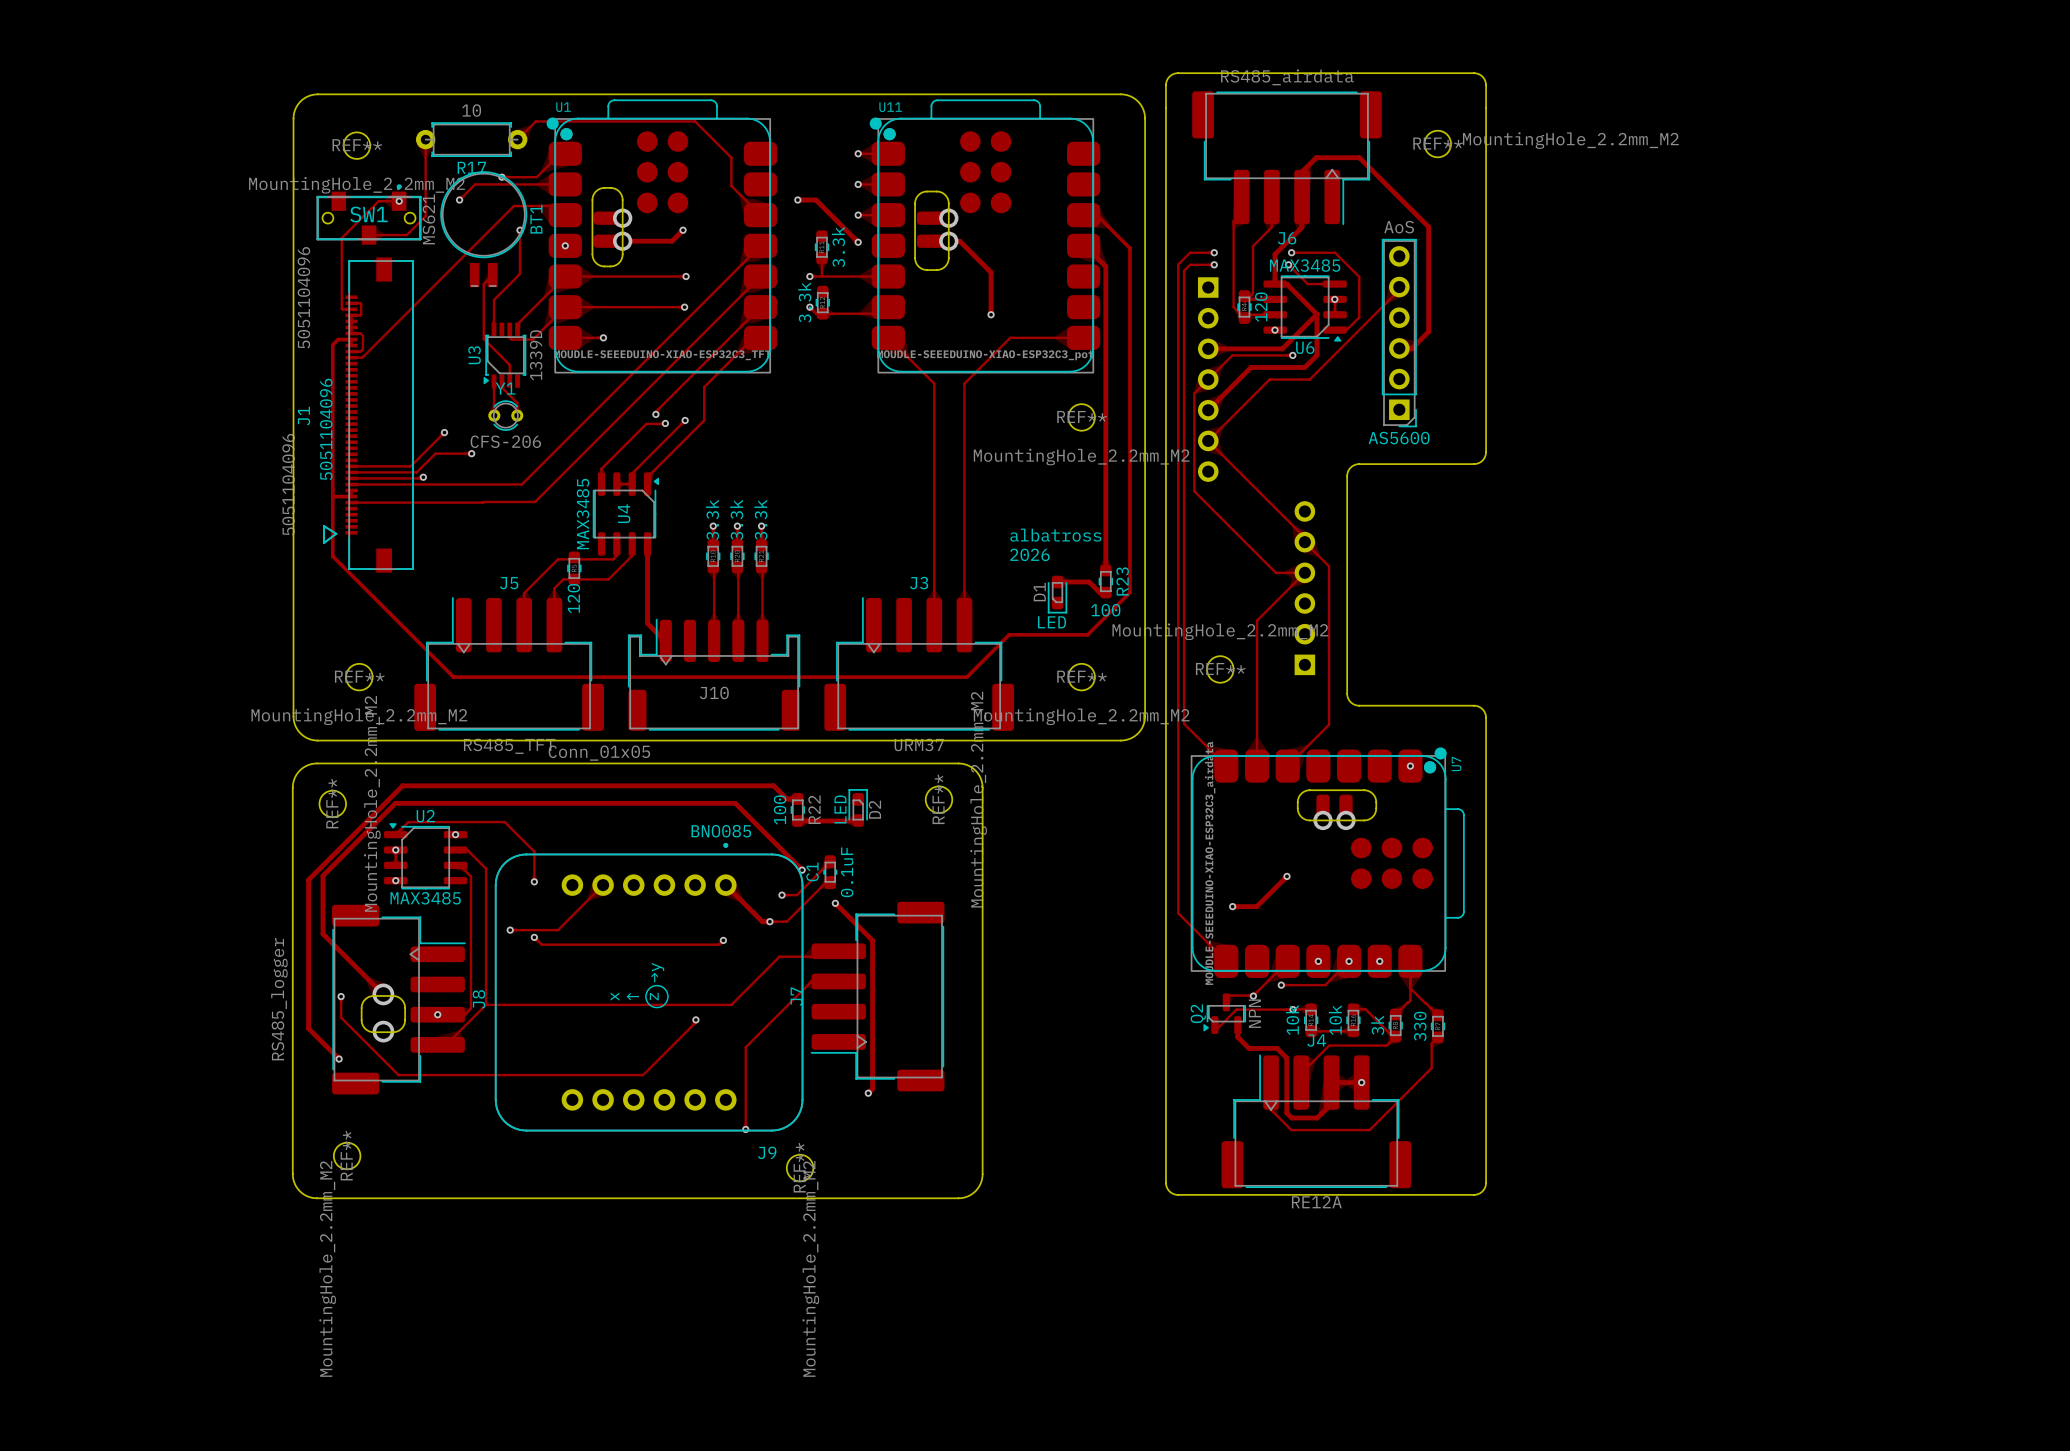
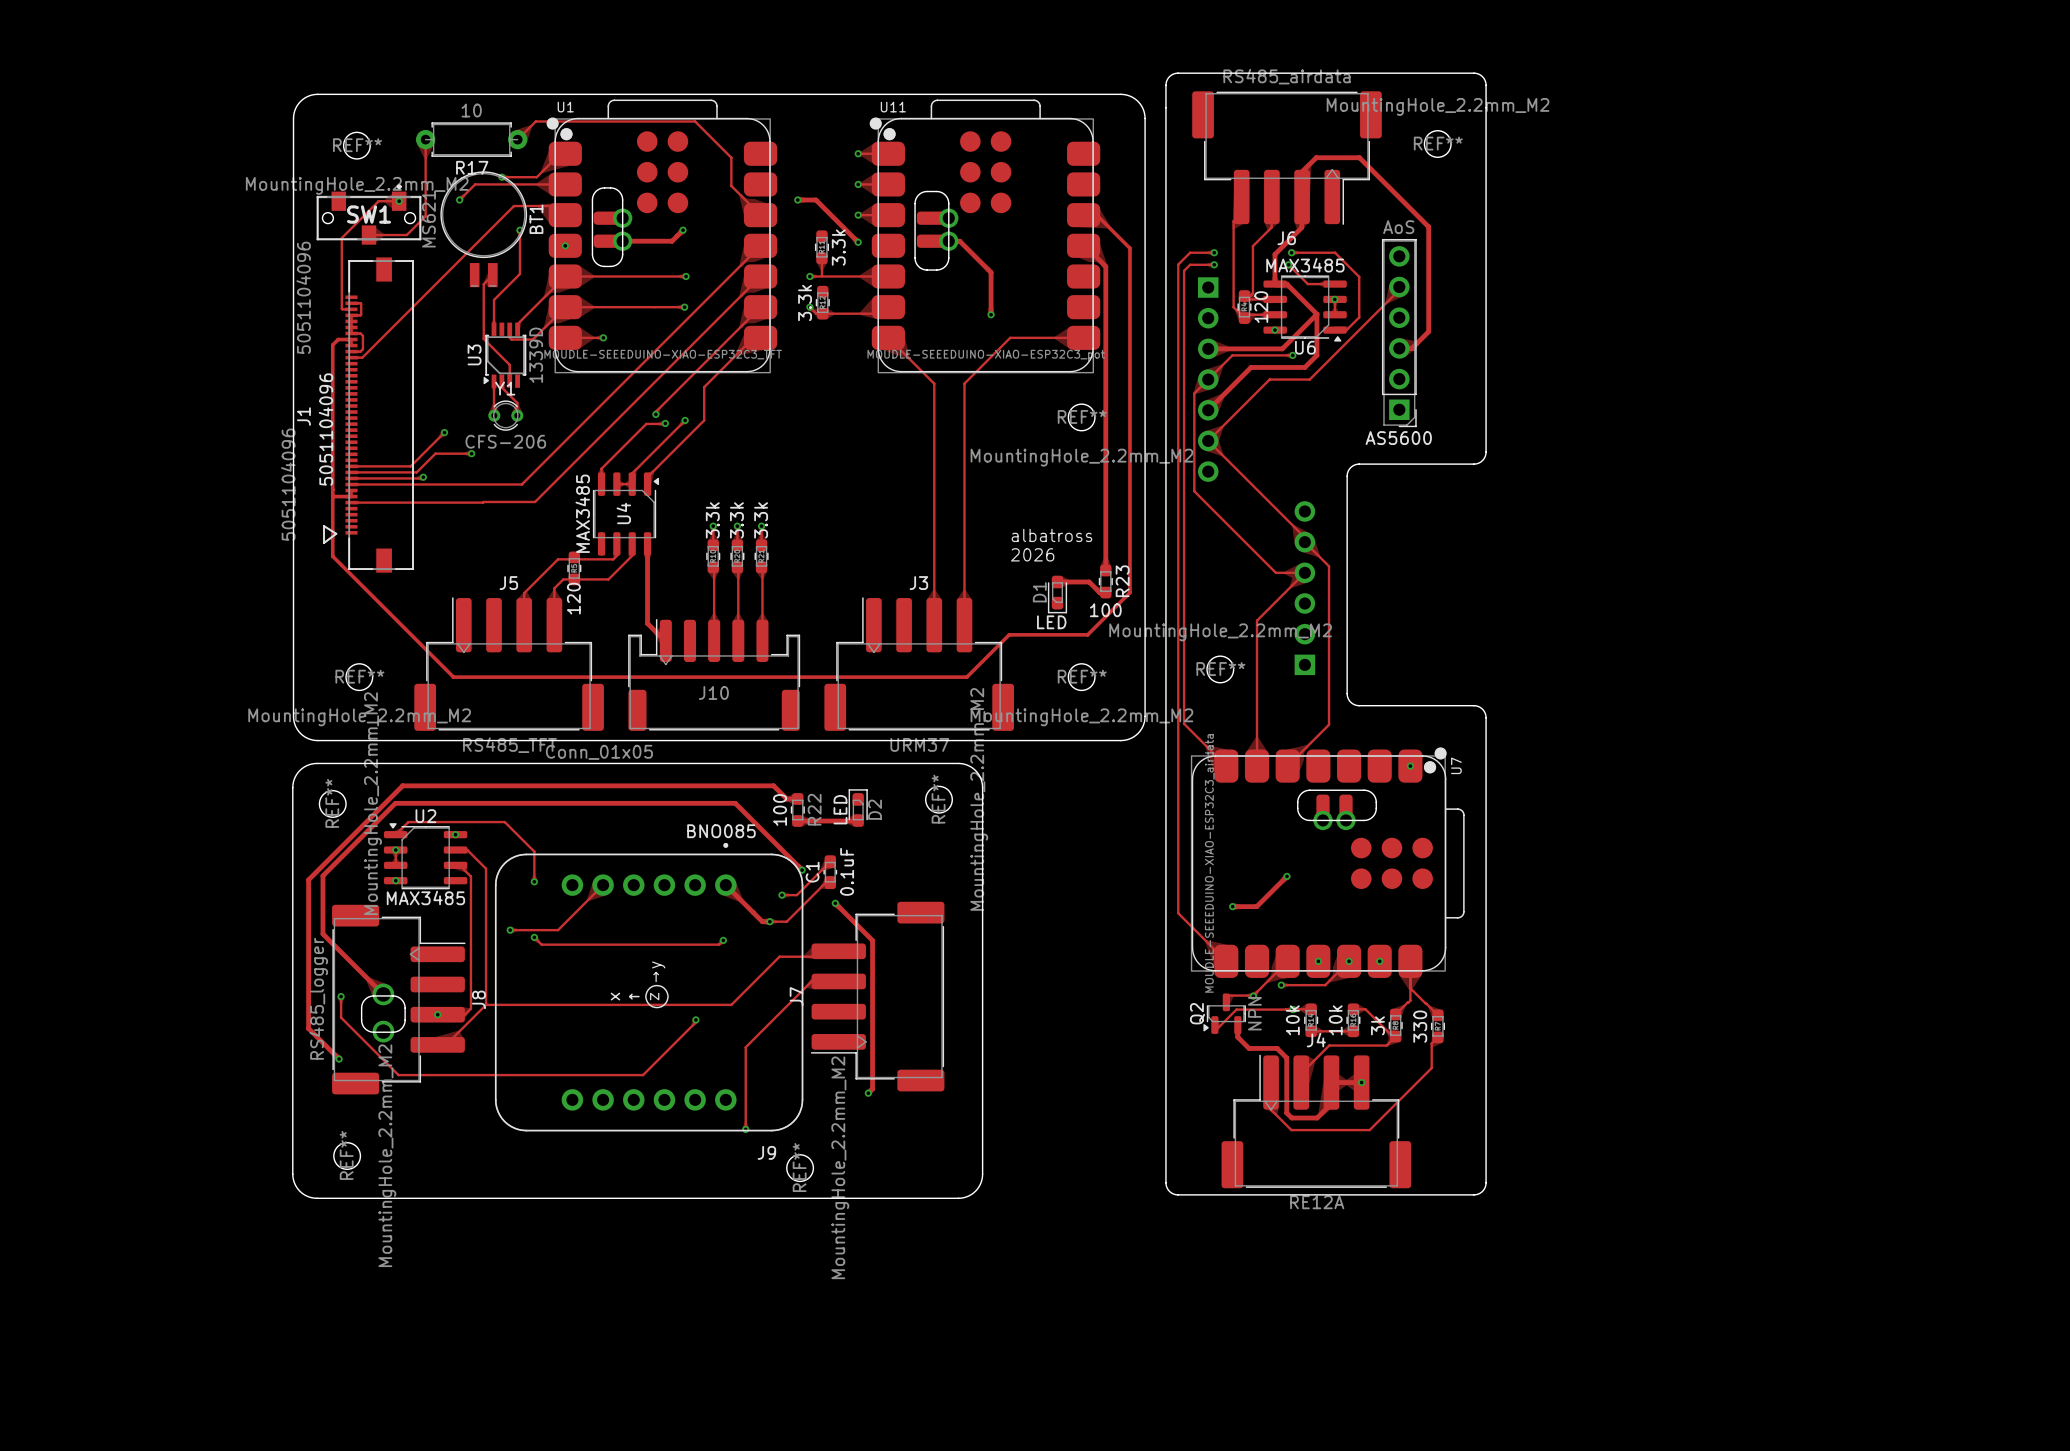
REF** value position: MountingHole_2.2mm_M2 (1570, 140) -> MountingHole_2.2mm_M2 (1438, 106)
J8 value position: RS485_logger (279, 999) -> RS485_logger (318, 998)
REF** value position: MountingHole_2.2mm_M2 (327, 1268) -> MountingHole_2.2mm_M2 (387, 1155)
REF** value position: MountingHole_2.2mm_M2 (810, 1268) -> MountingHole_2.2mm_M2 (840, 1167)

